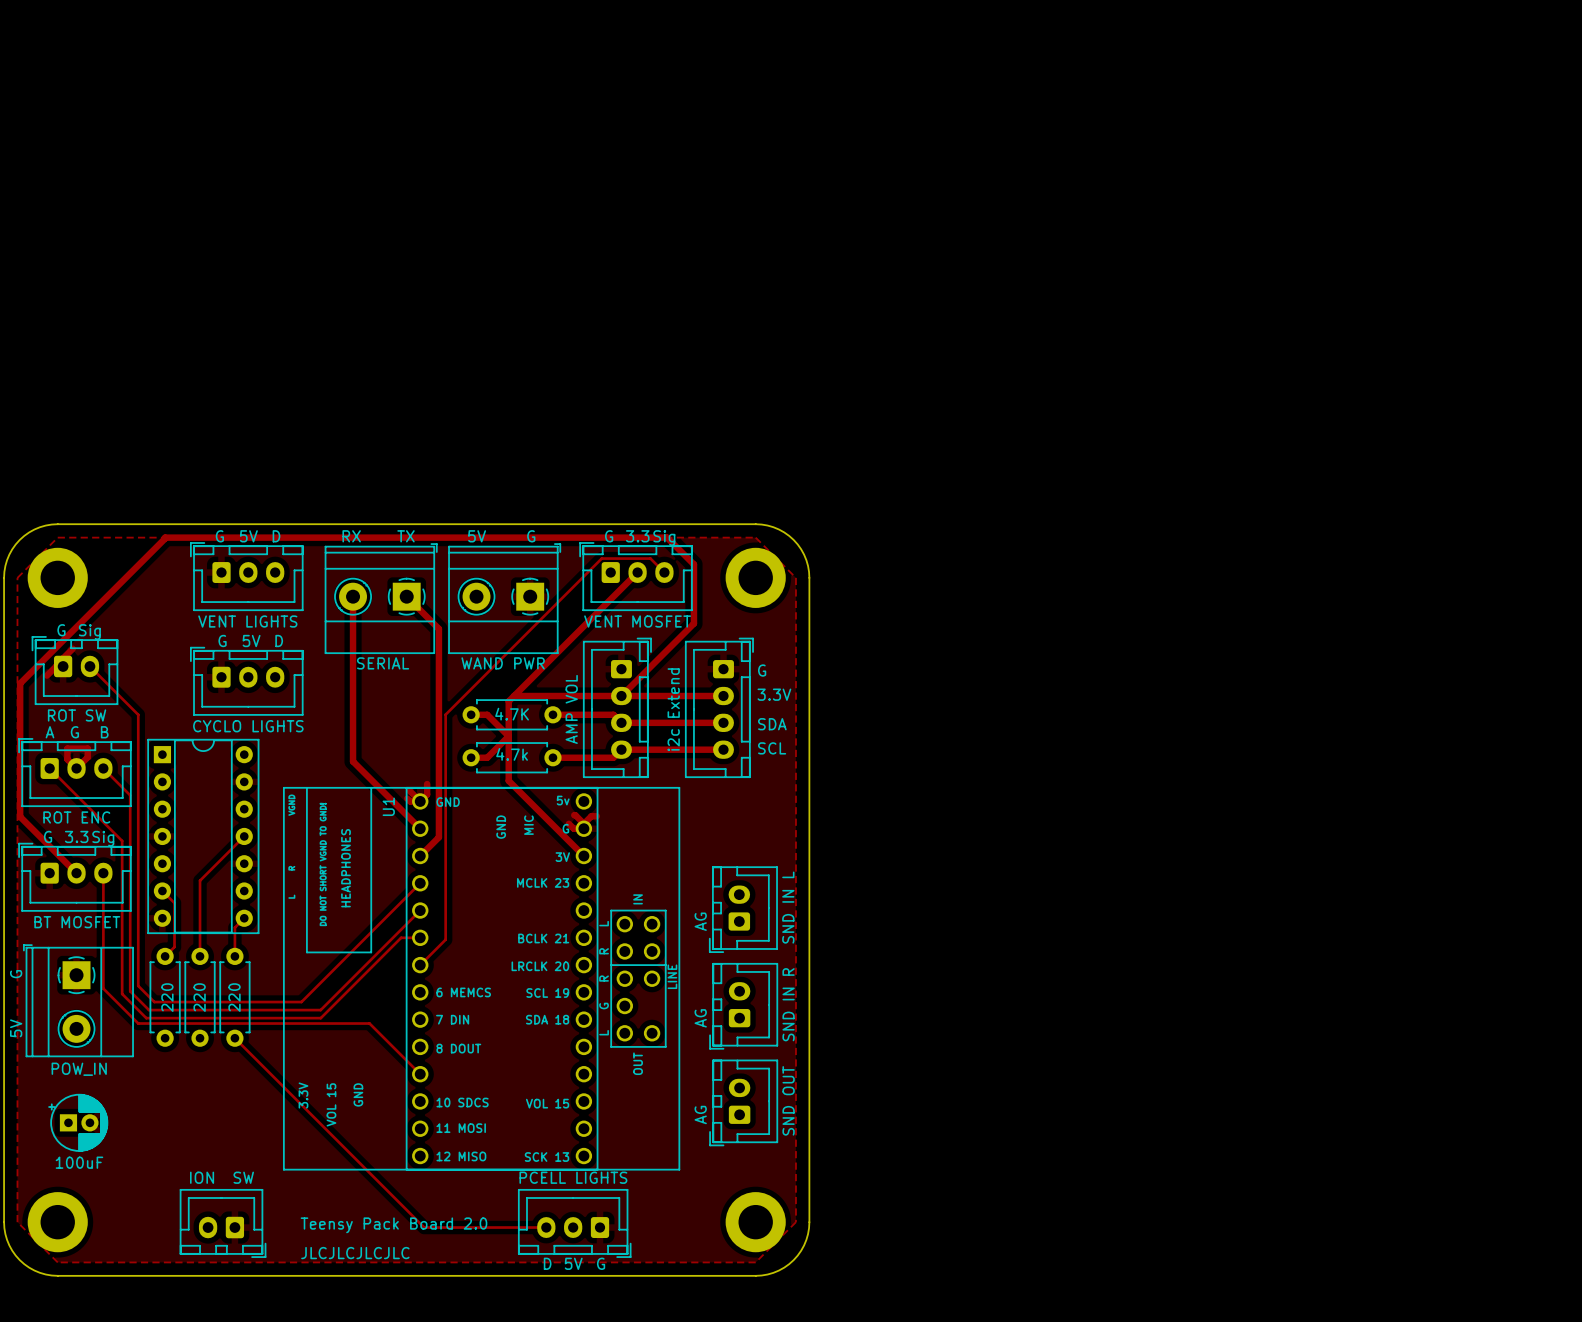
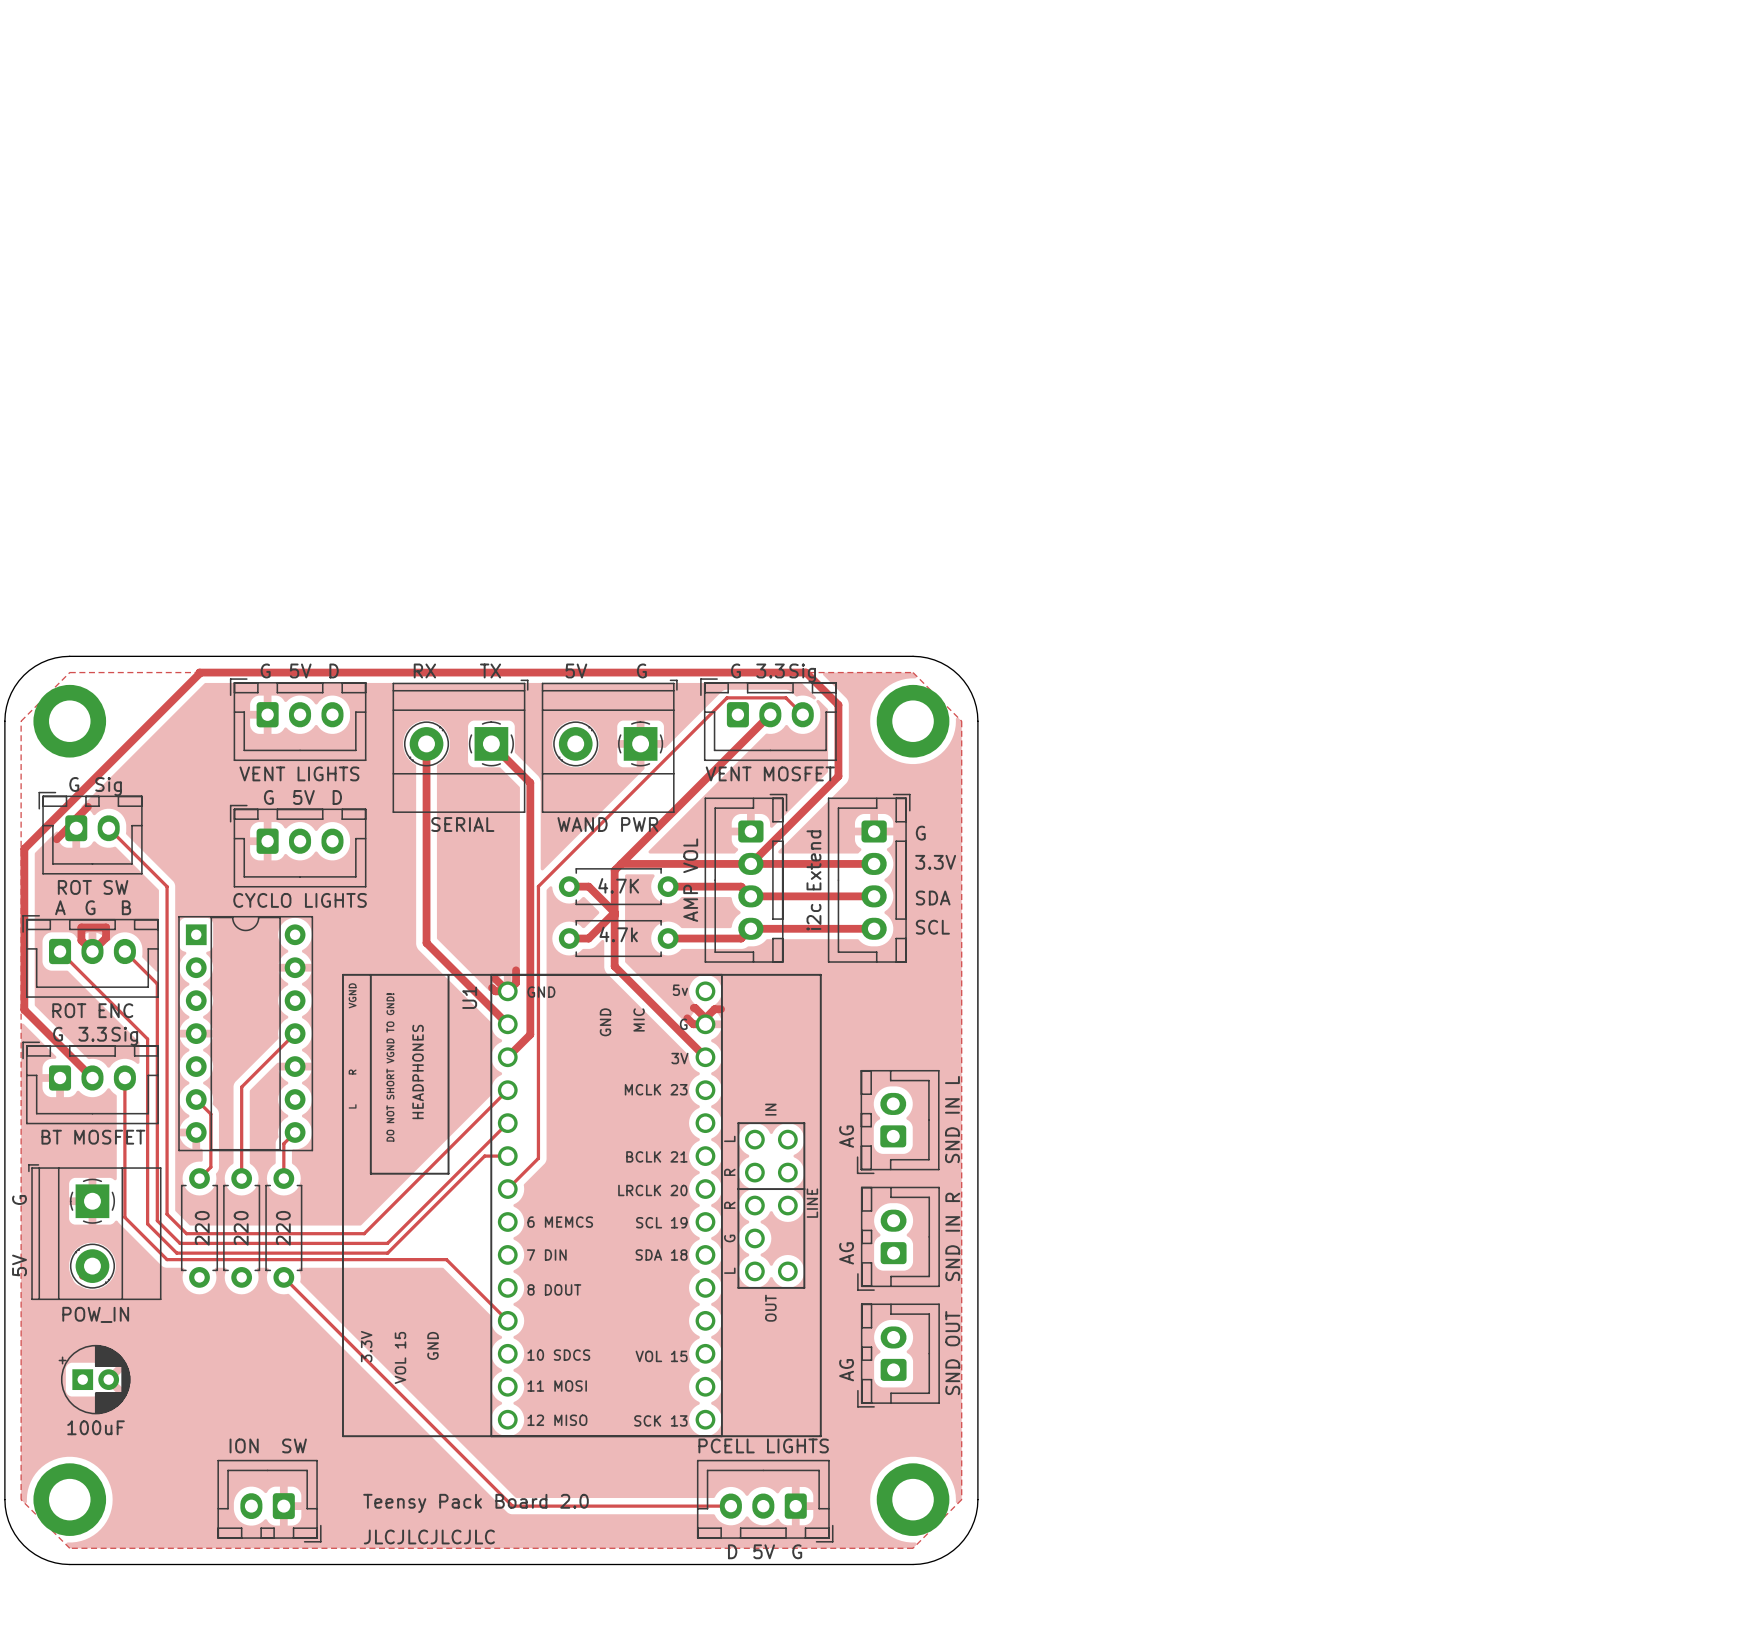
part position: (574, 1223) -> (765, 1501)
track: none -> (660, 1506) (730, 1506)
text: D (547, 1263) -> none
text position: 5V (573, 1263) -> 5V (764, 1551)
text: G (601, 1263) -> D (732, 1551)
text: none -> G (797, 1551)

